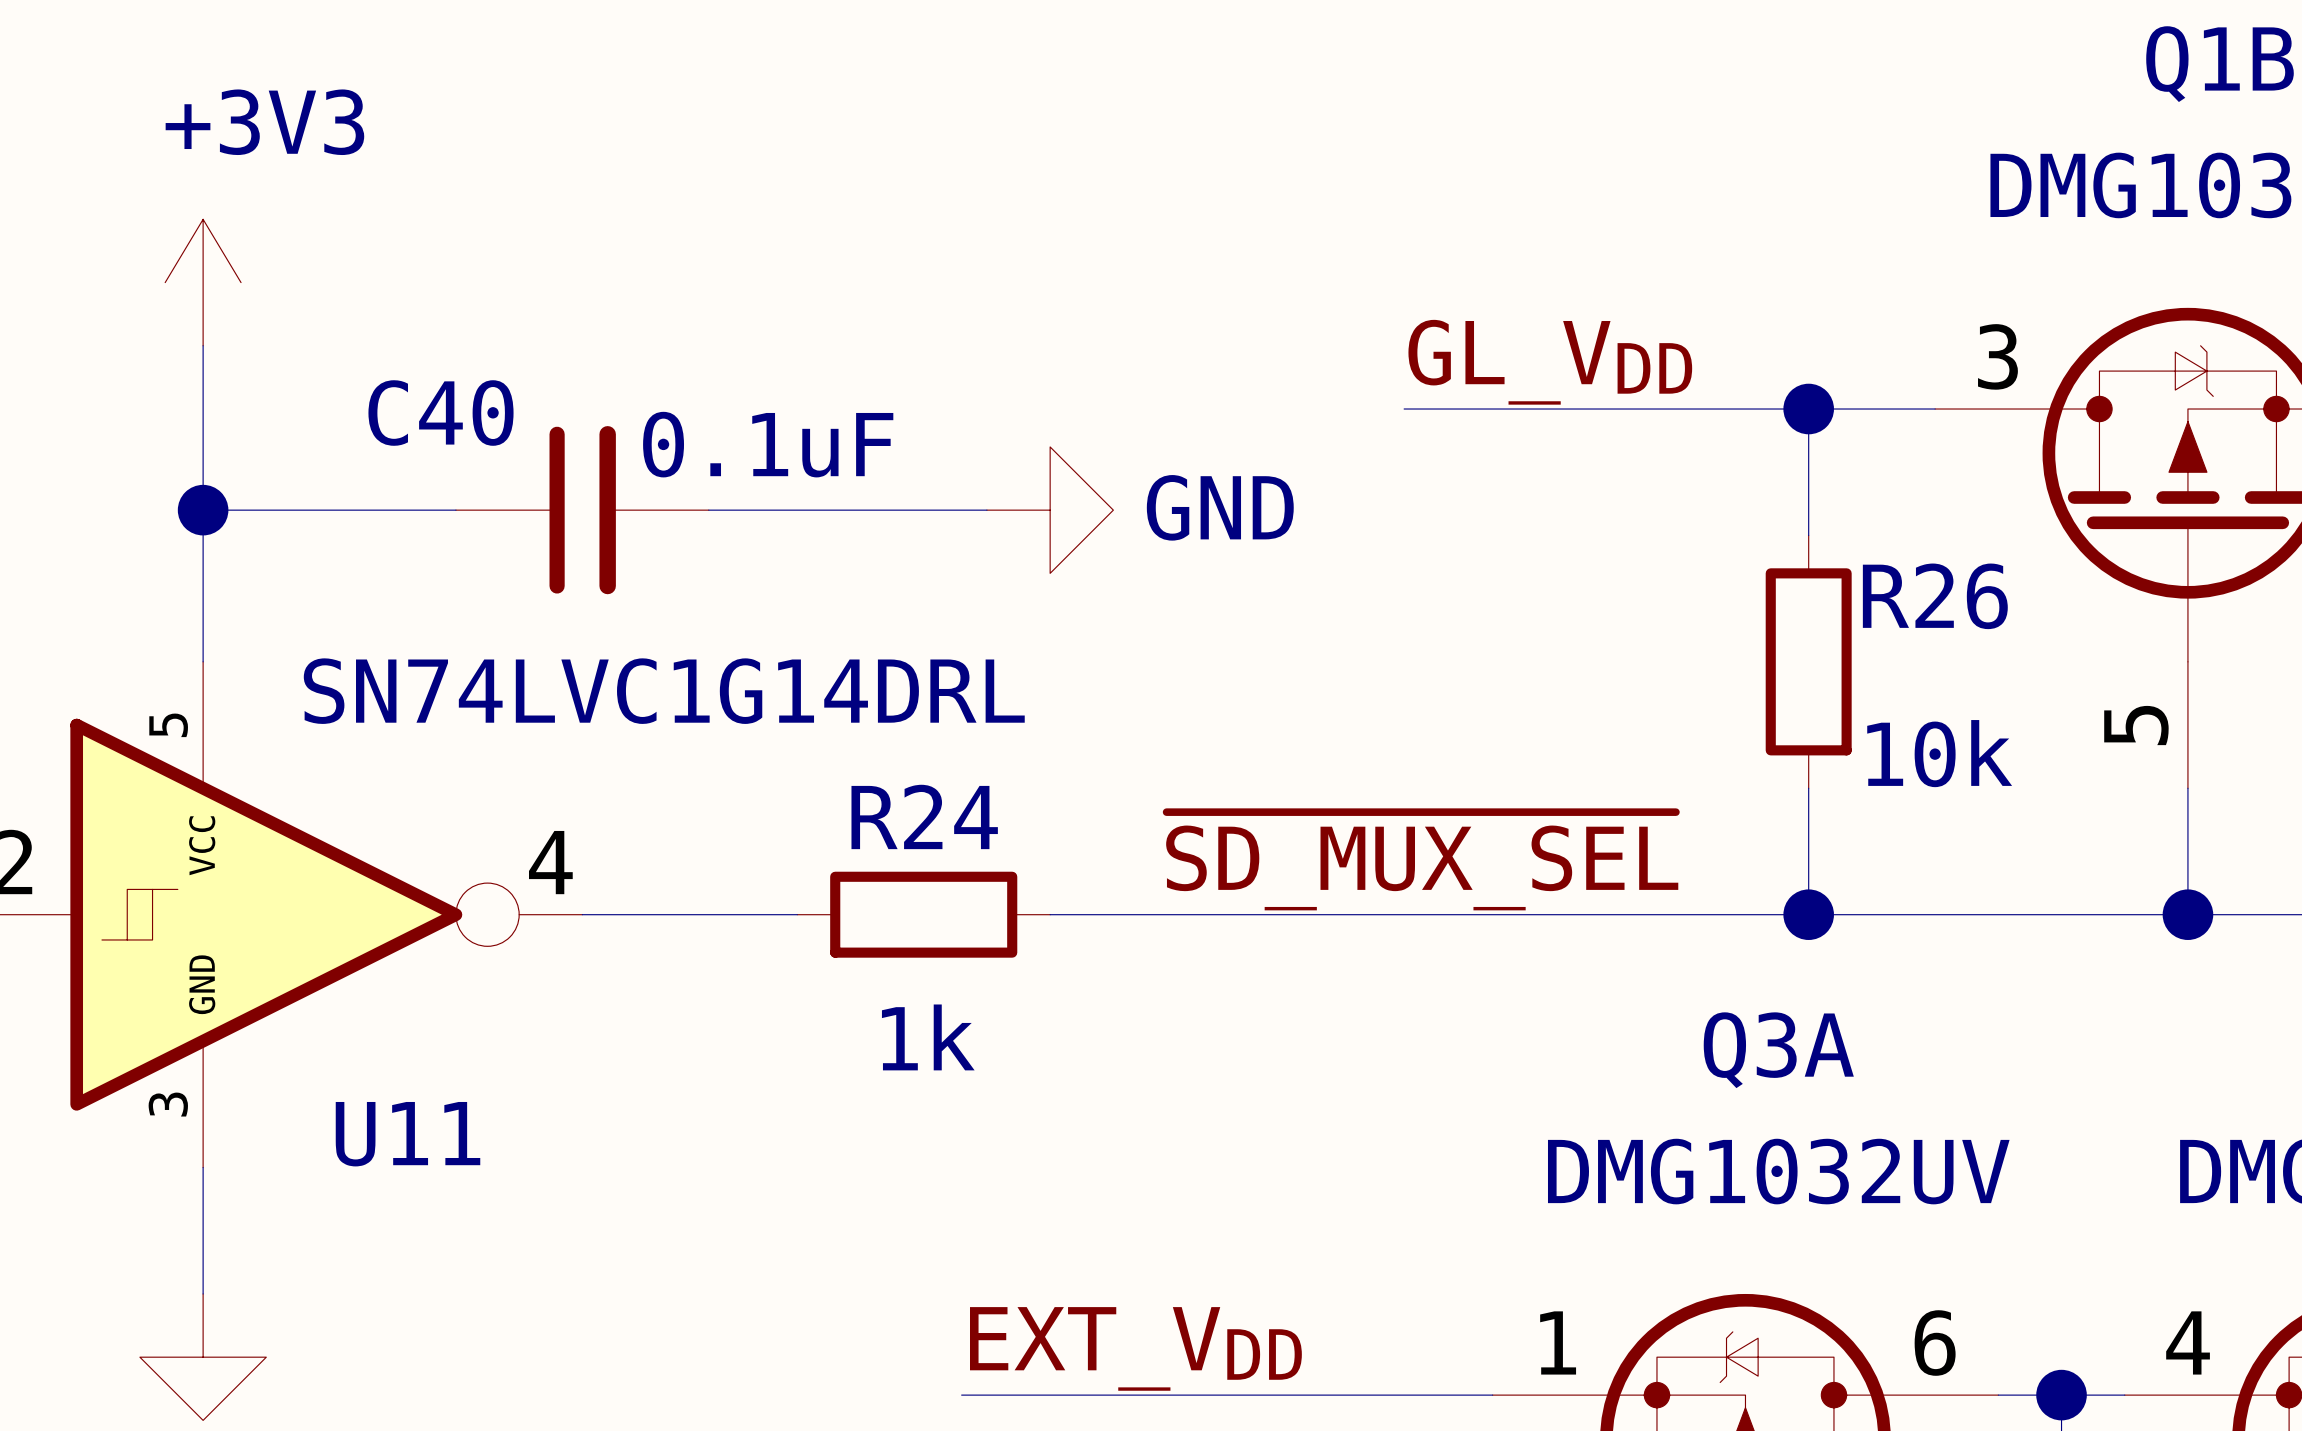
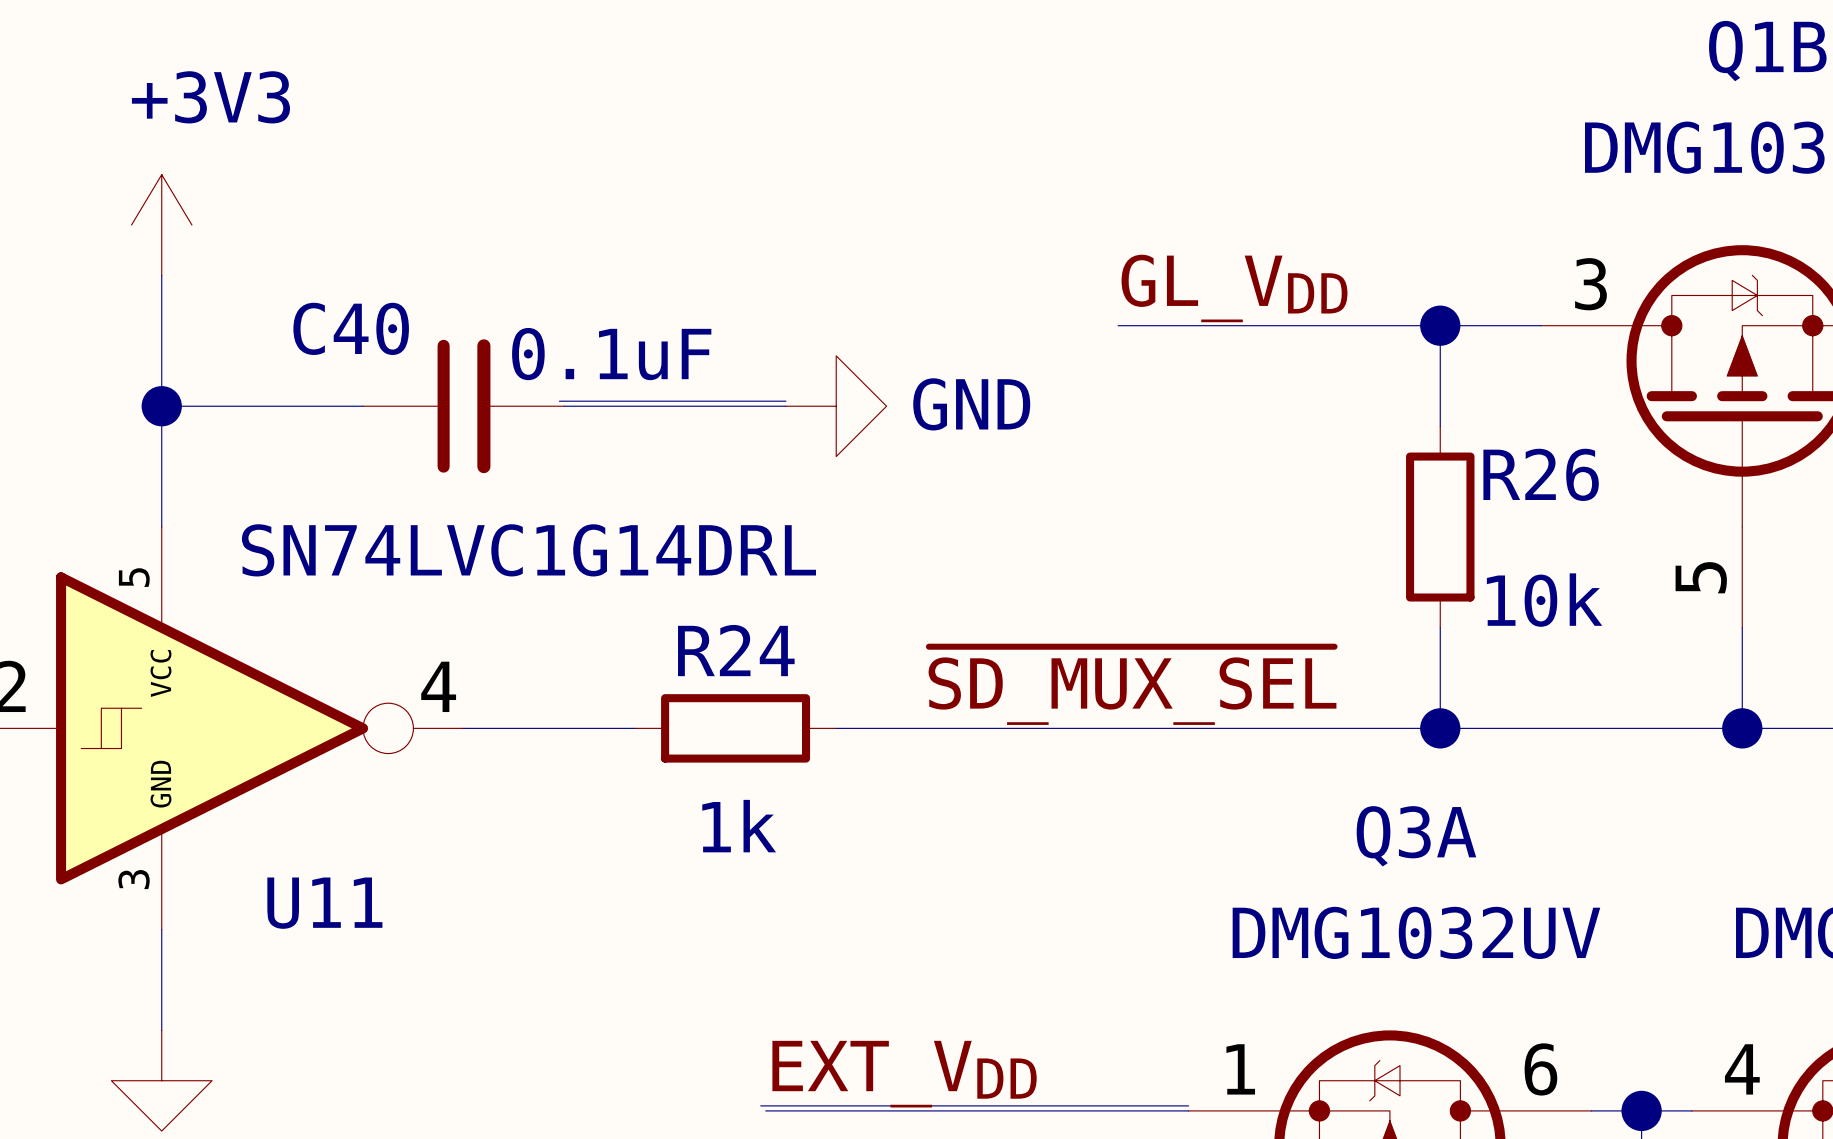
wire: none -> (559, 401) (785, 401)
wire: none -> (760, 1105) (1188, 1105)

